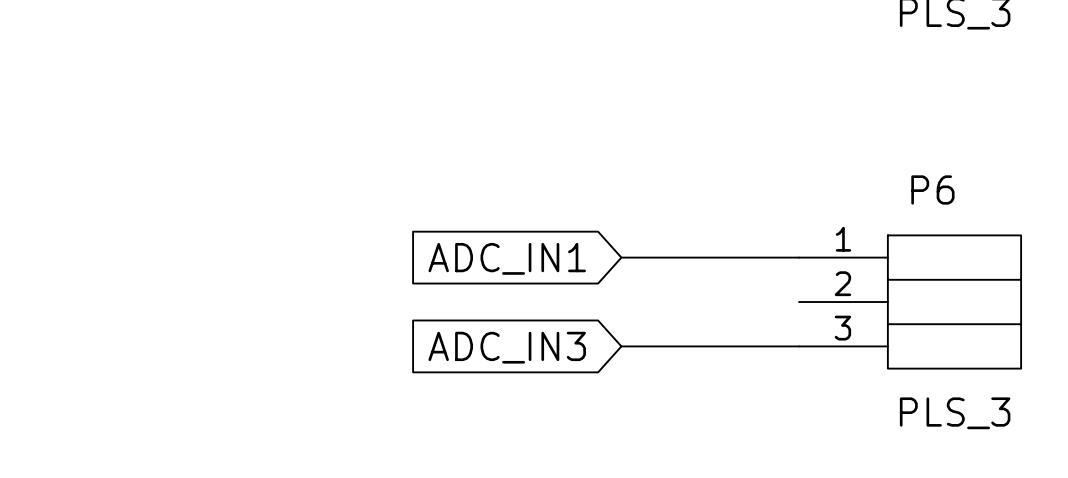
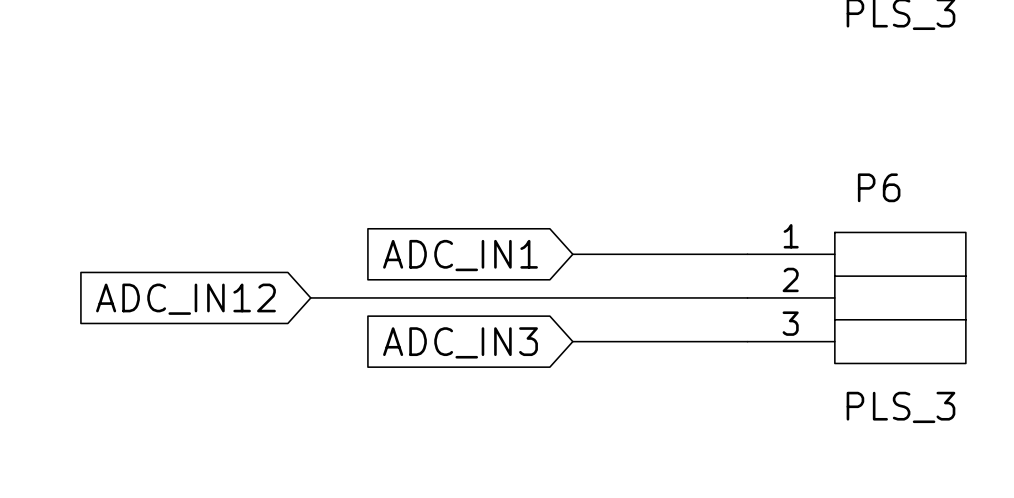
wire: none -> (310, 297) (747, 297)
global label: none -> ADC_IN12 (185, 299)

